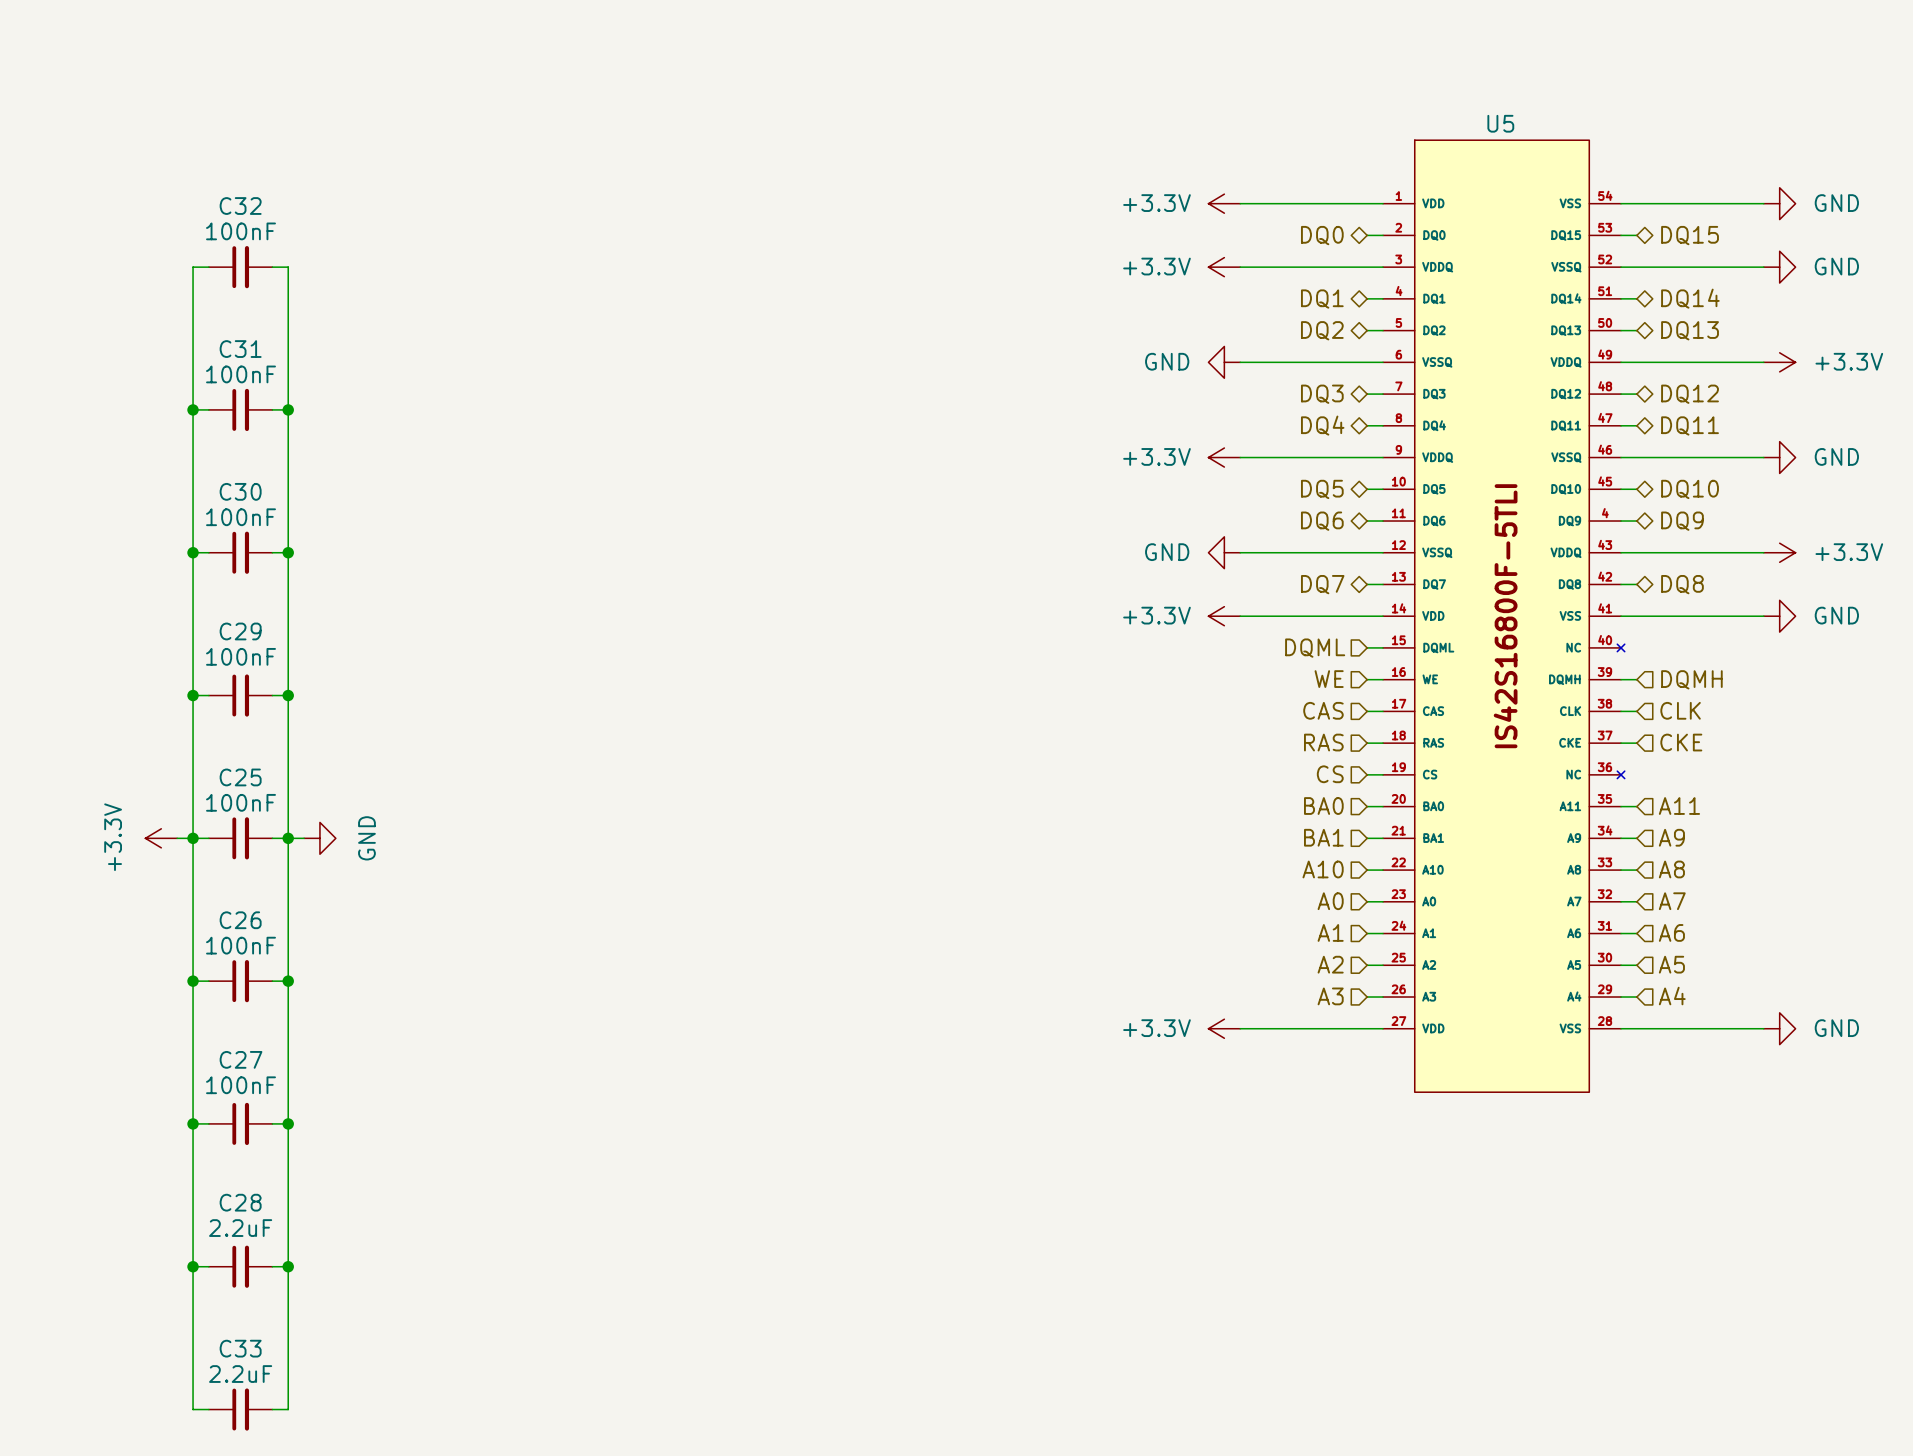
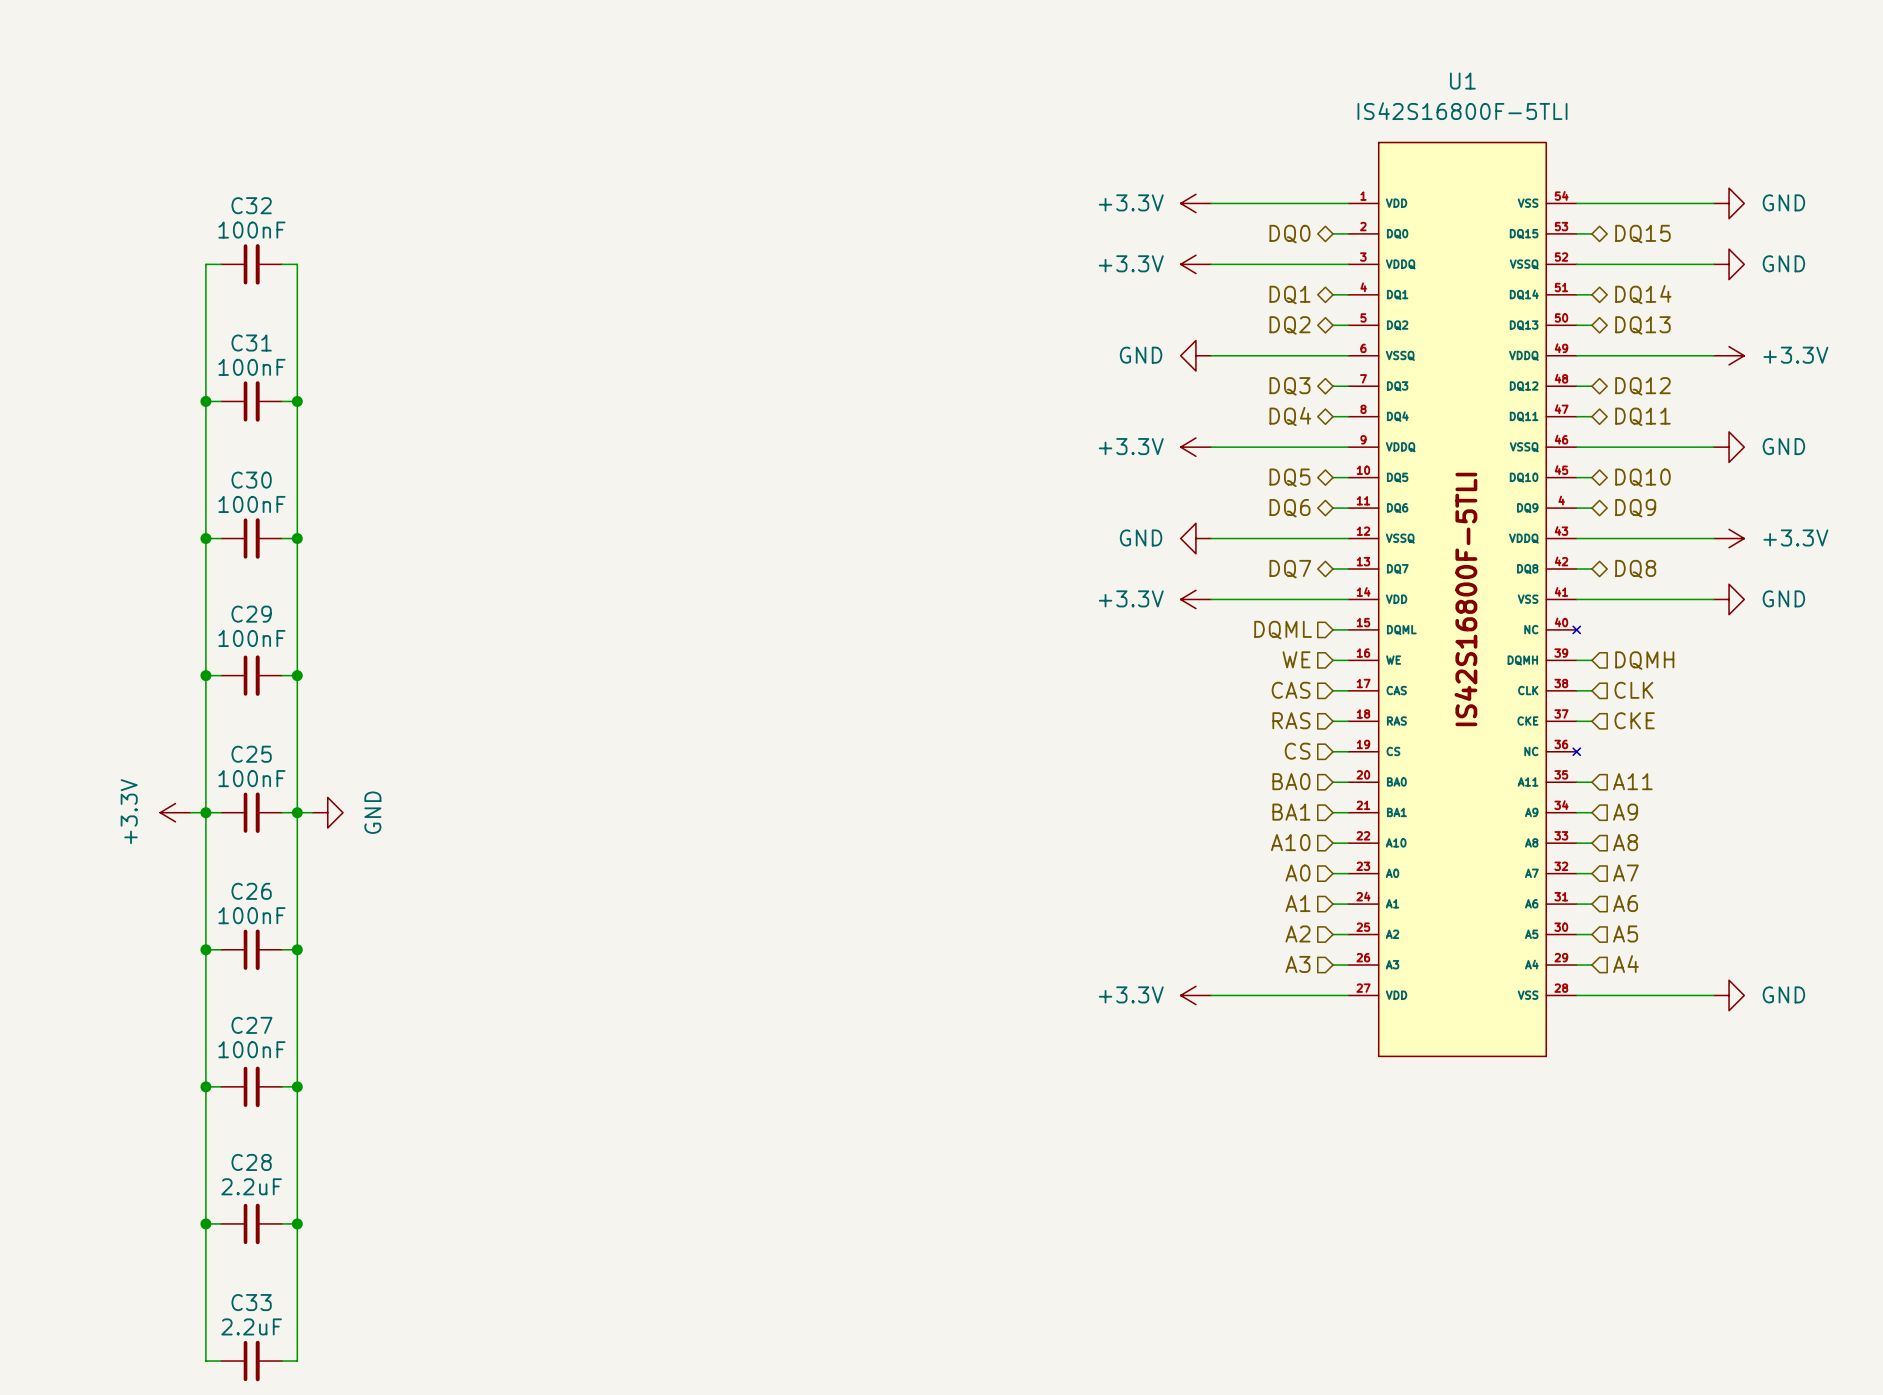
U5 value: none -> IS42S16800F-5TLI (1462, 111)
U5 name: U5 (1500, 123) -> U1 (1462, 81)

